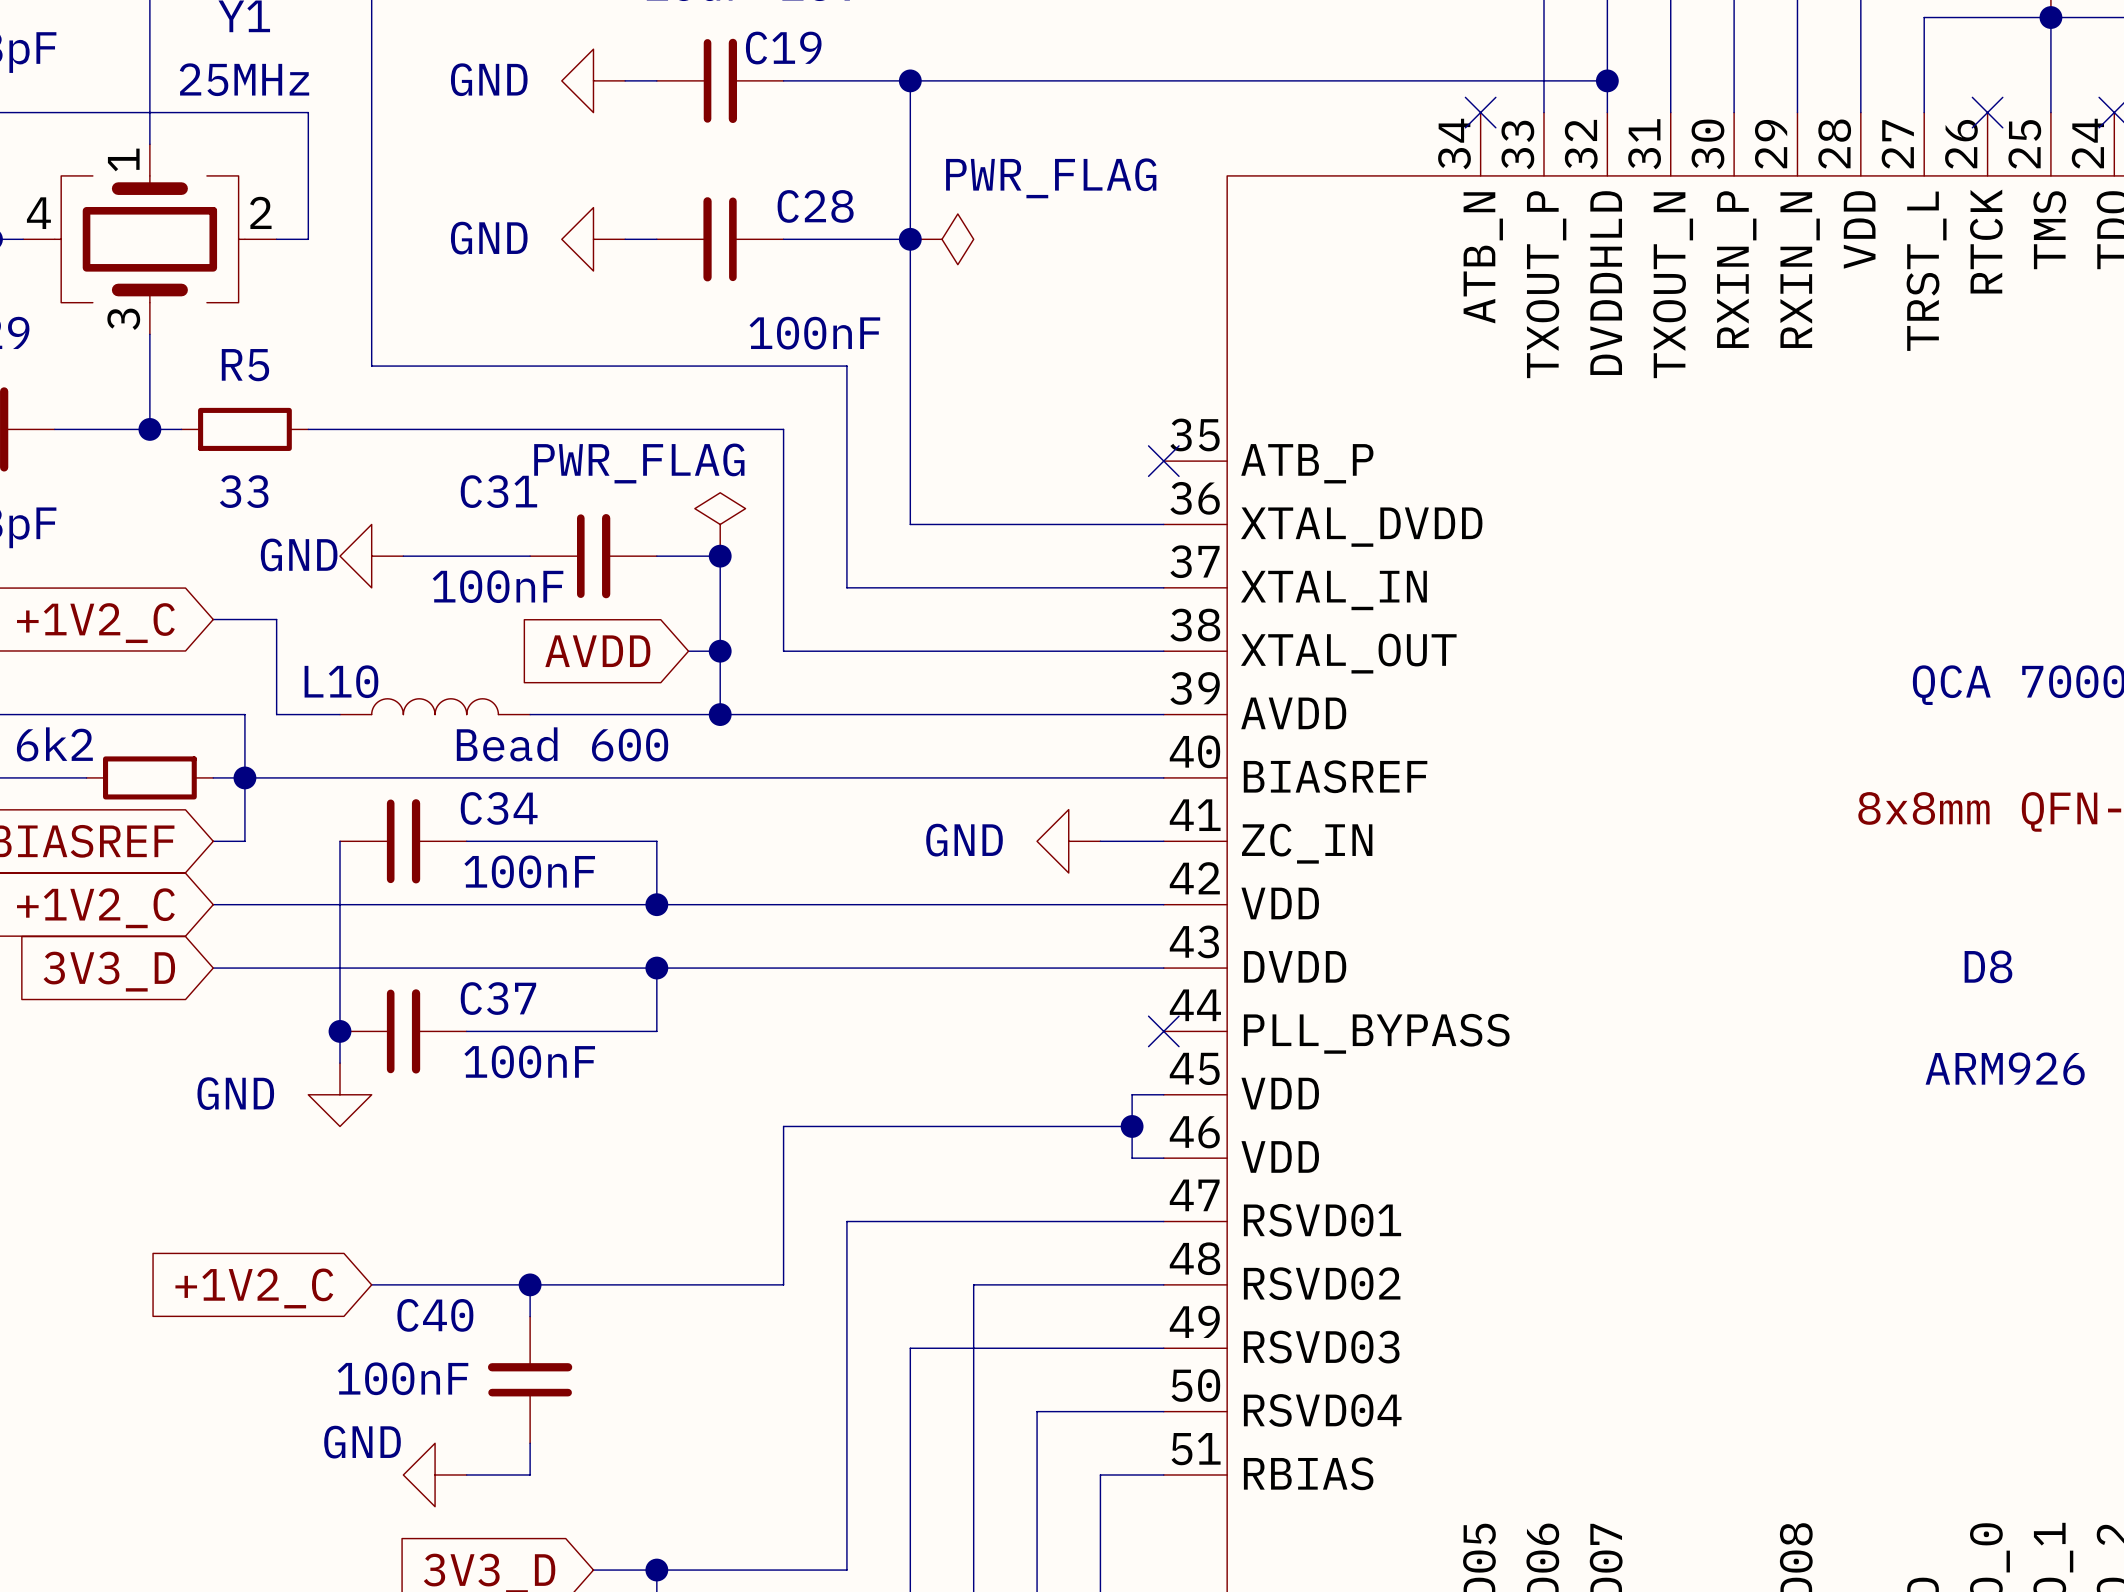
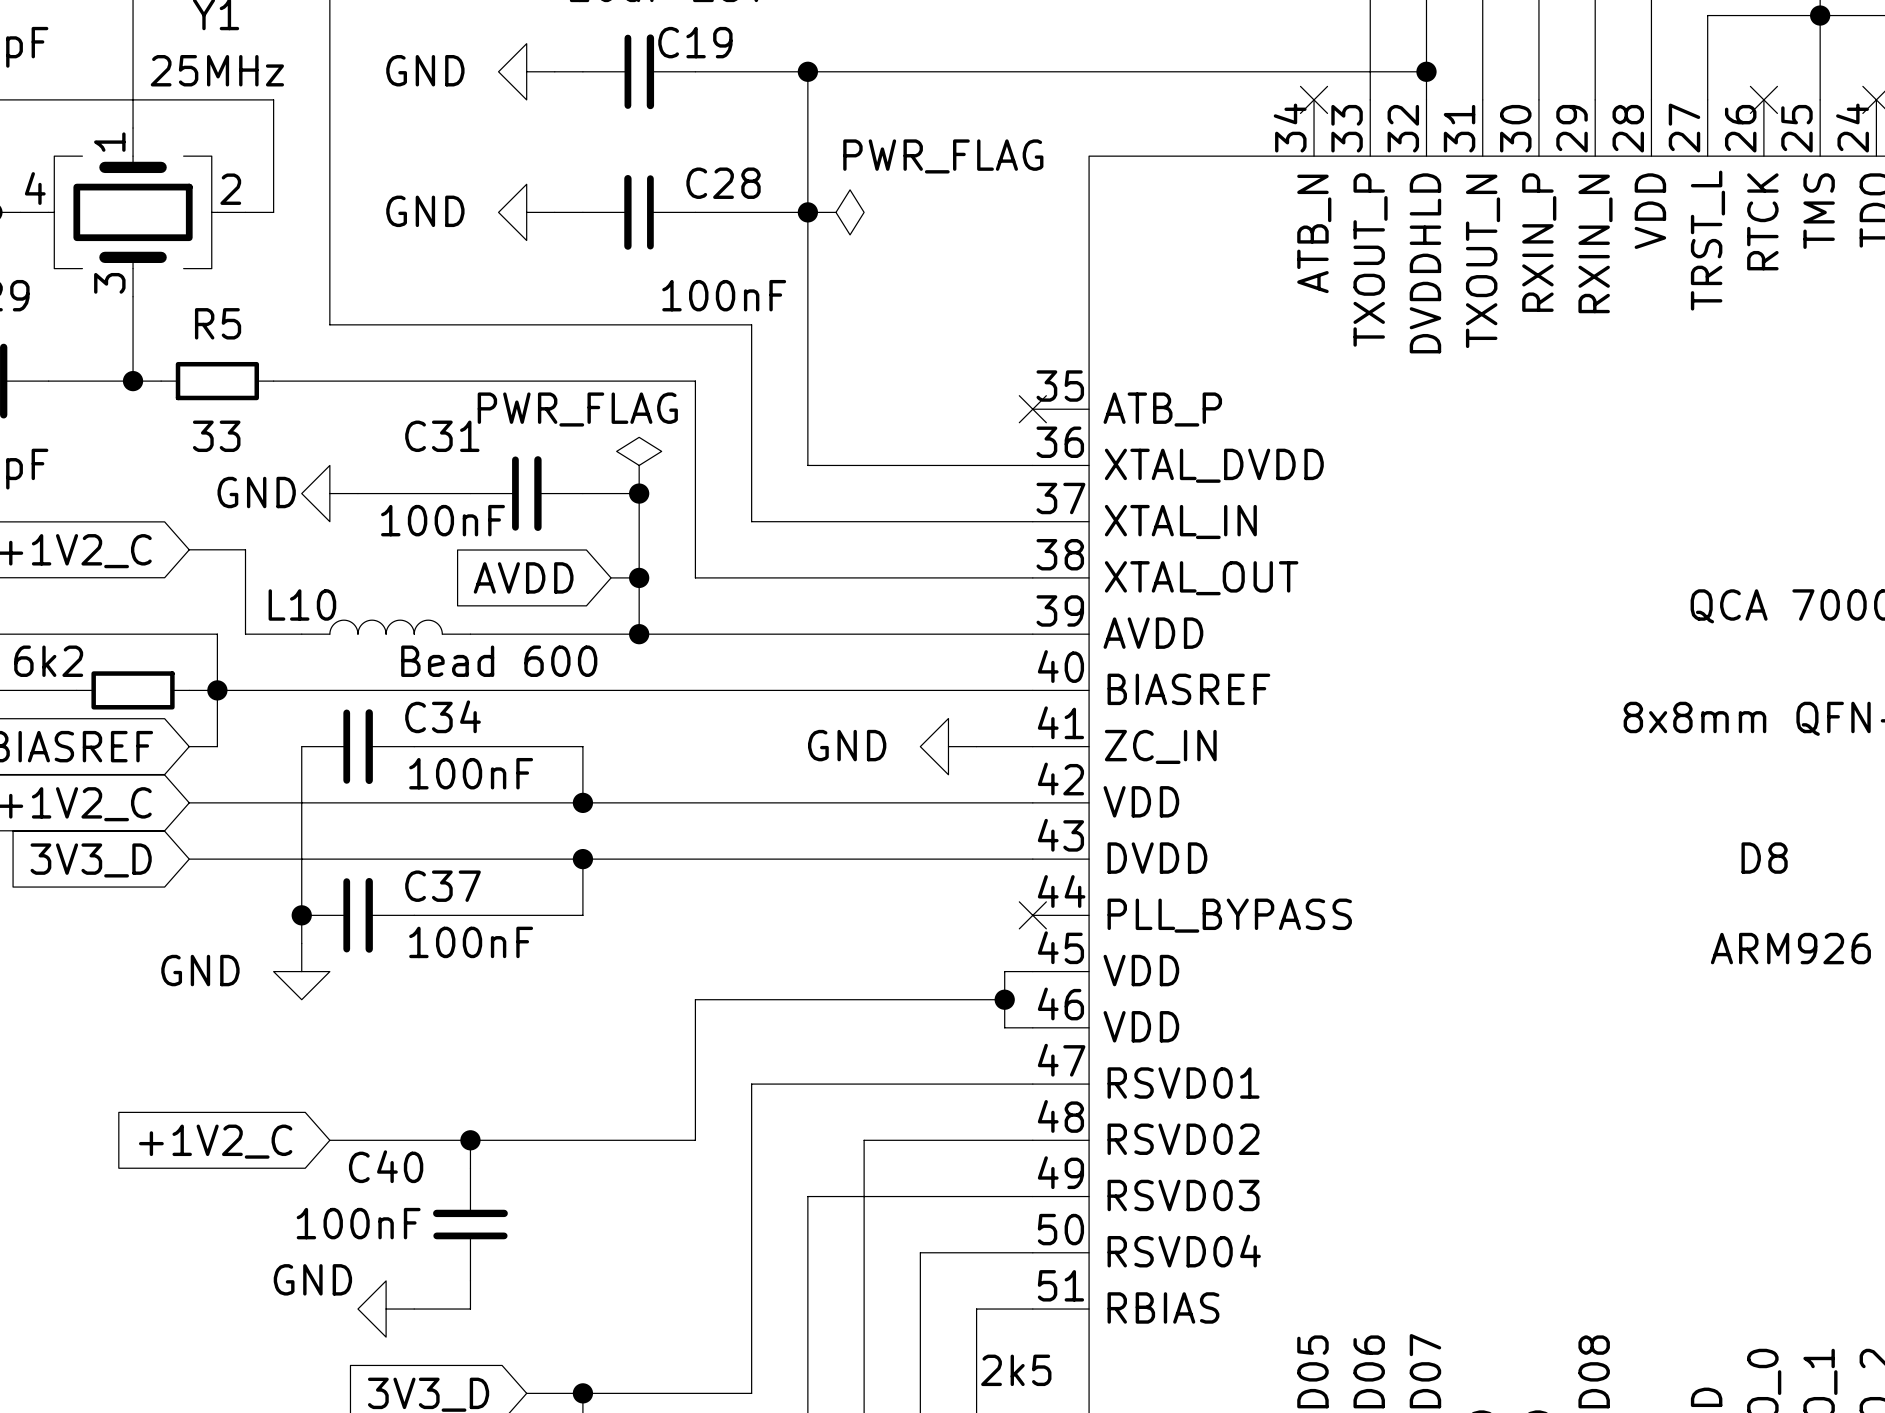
text: none -> 2k5 (1016, 1370)

